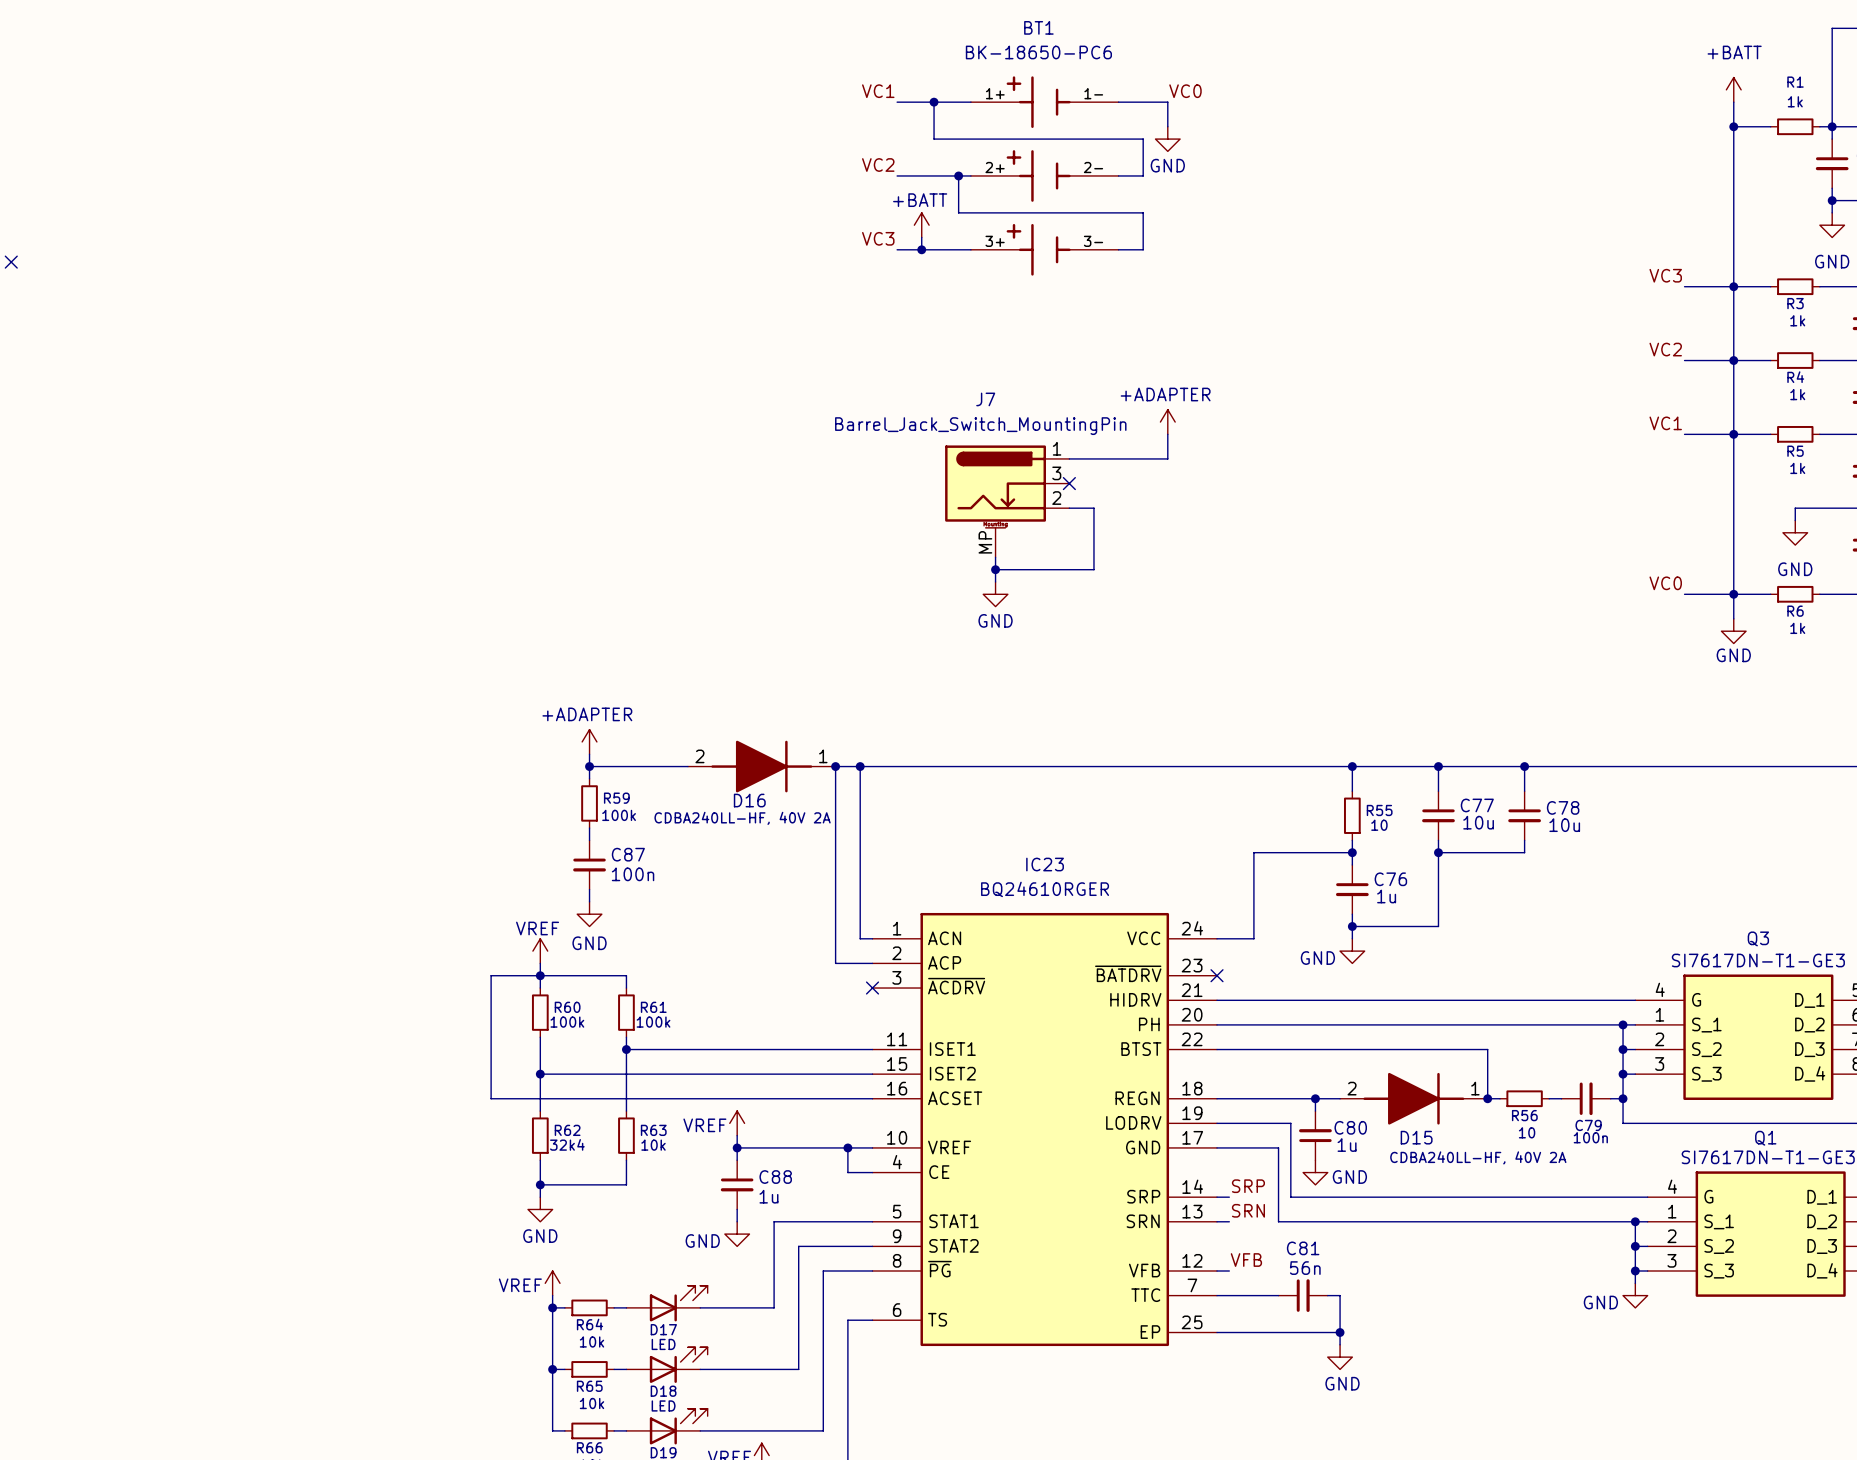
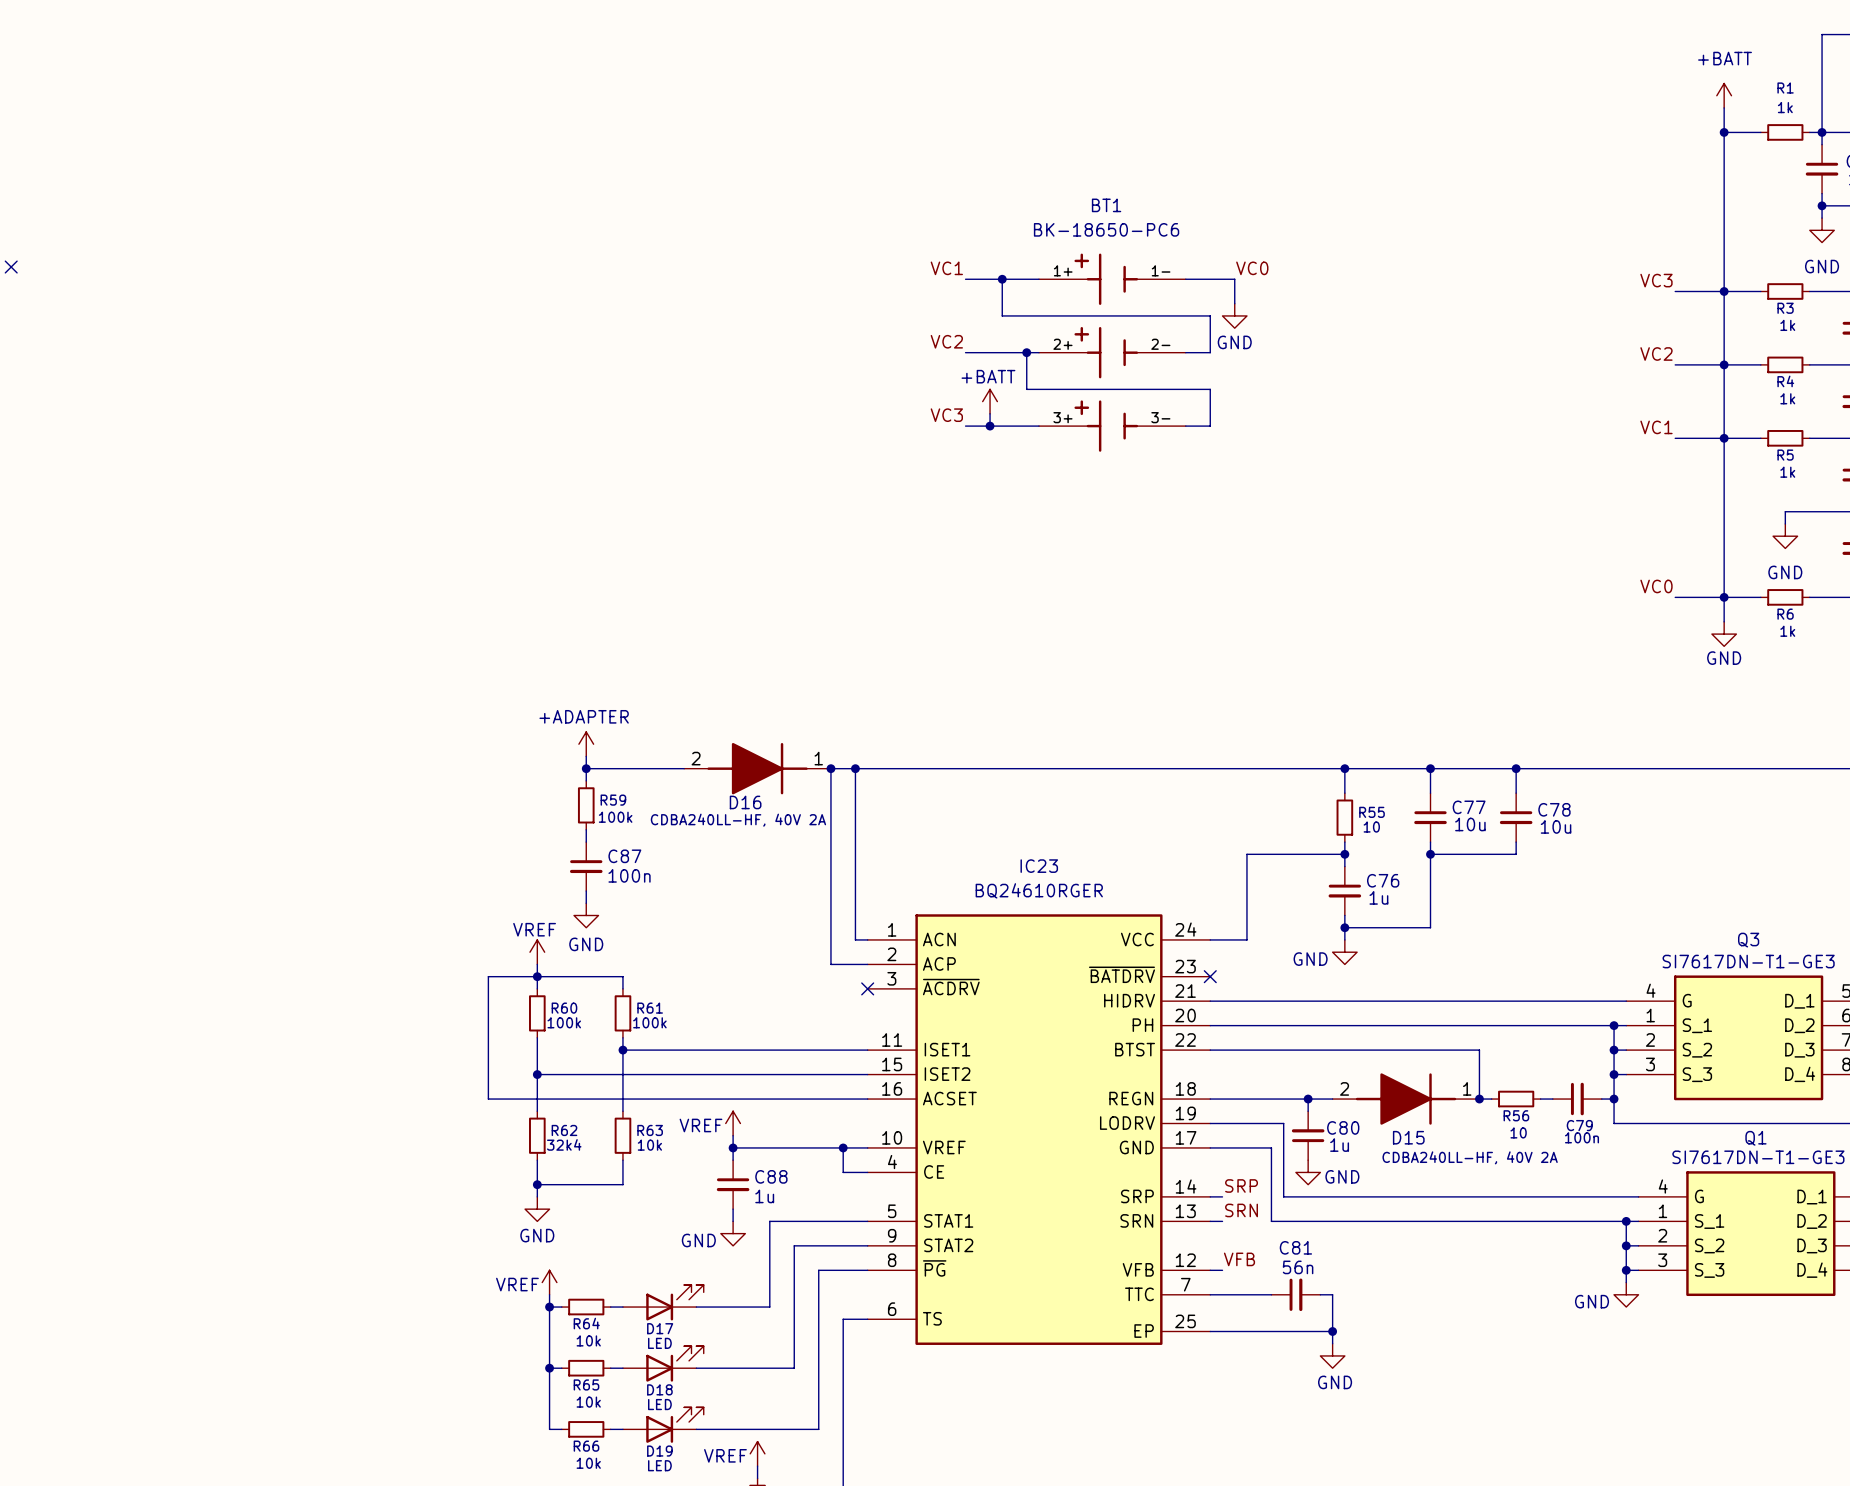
label position: VC1 (878, 91) -> VC1 (946, 268)
label position: VC0 (1185, 91) -> VC0 (1252, 268)
wire: (897, 102) (970, 102) -> (965, 279) (1038, 279)
wire: (934, 102) (934, 139) (1143, 139) (1143, 175) (1118, 175) -> (1002, 279) (1002, 315) (1210, 315) (1210, 352) (1185, 352)
junction: (934, 102) -> none
wire: (1118, 102) (1167, 102) (1167, 126) -> (1185, 279) (1234, 279) (1234, 303)
power symbol position: GND (1167, 139) -> GND (1234, 315)
label position: VC2 (878, 165) -> VC2 (946, 341)
wire: (897, 175) (970, 175) -> (965, 352) (1038, 352)
wire: (958, 175) (958, 212) (1143, 212) (1143, 249) (1118, 249) -> (1026, 352) (1026, 389) (1210, 389) (1210, 426) (1185, 426)
junction: (958, 175) -> none
BT1 position: (1044, 175) -> (1112, 352)
power symbol position: +BATT (921, 225) -> +BATT (990, 401)
wire: (921, 237) (921, 249) -> (990, 413) (990, 426)
label position: VC3 (878, 238) -> VC3 (946, 415)
wire: (897, 249) (970, 249) -> (965, 426) (1038, 426)
junction: (921, 249) -> none
junction: none -> (1002, 279)
junction: none -> (1026, 352)
junction: none -> (990, 426)
power symbol: +ADAPTER (1167, 422) -> none
wire: (1167, 434) (1167, 458) (1069, 458) -> none
no-connect mark: (1069, 483) -> none
J7: Barrel_Jack_Switch_MountingPin (1007, 501) -> none
wire: (1069, 508) (1093, 508) (1093, 569) (995, 569) -> none
wire: (995, 557) (995, 582) -> none
junction: (995, 569) -> none
power symbol: GND (995, 594) -> none

